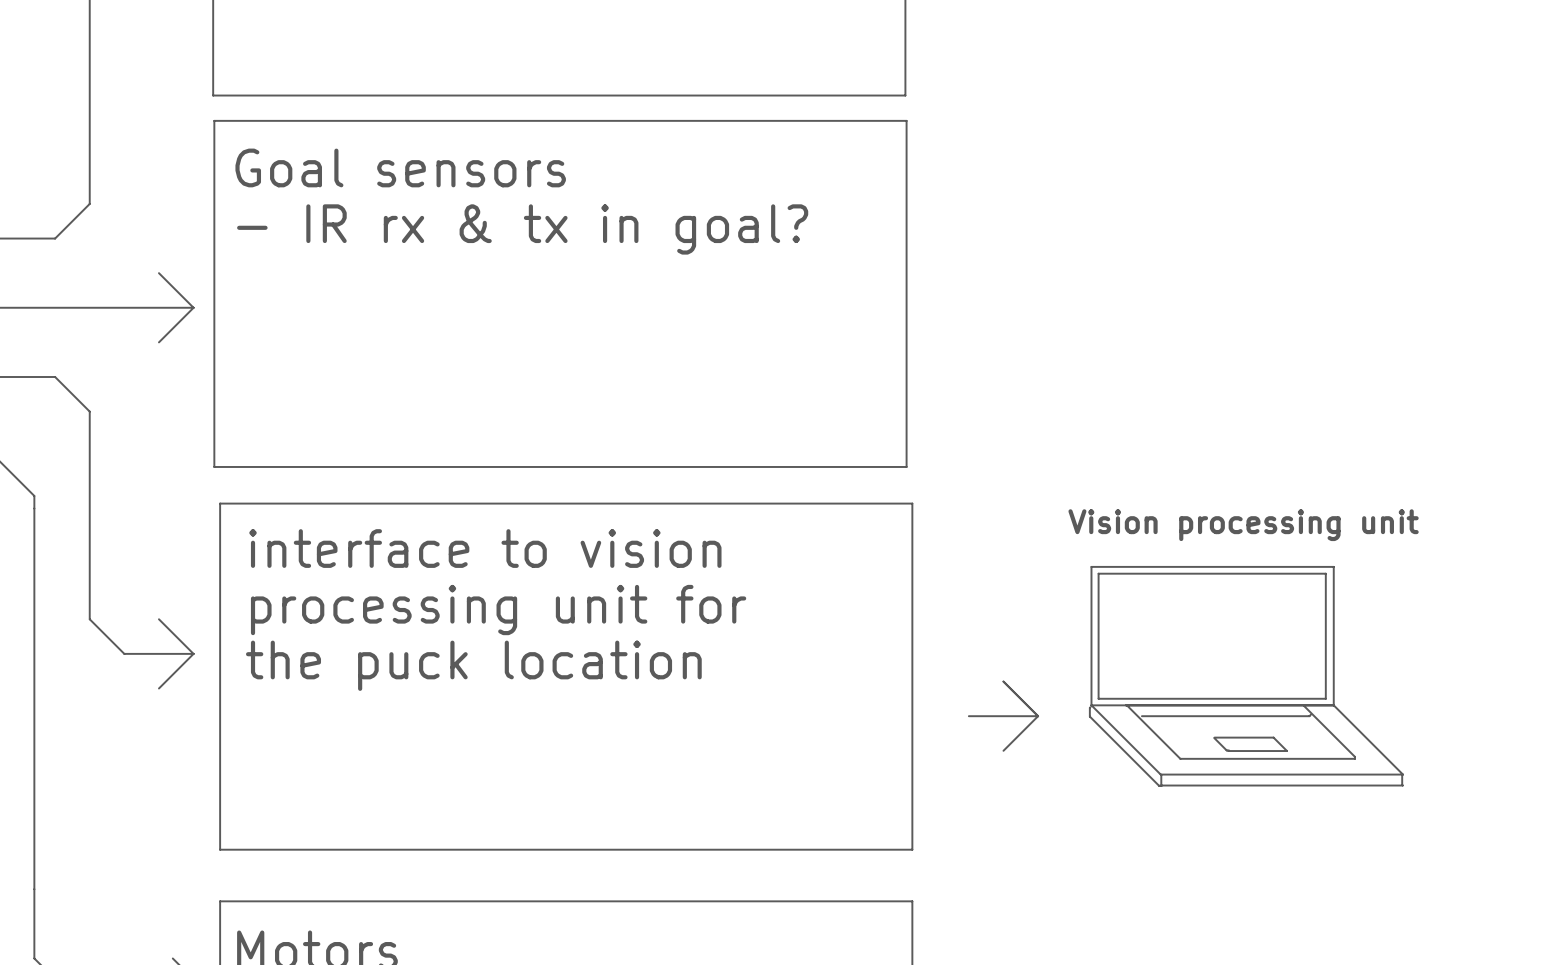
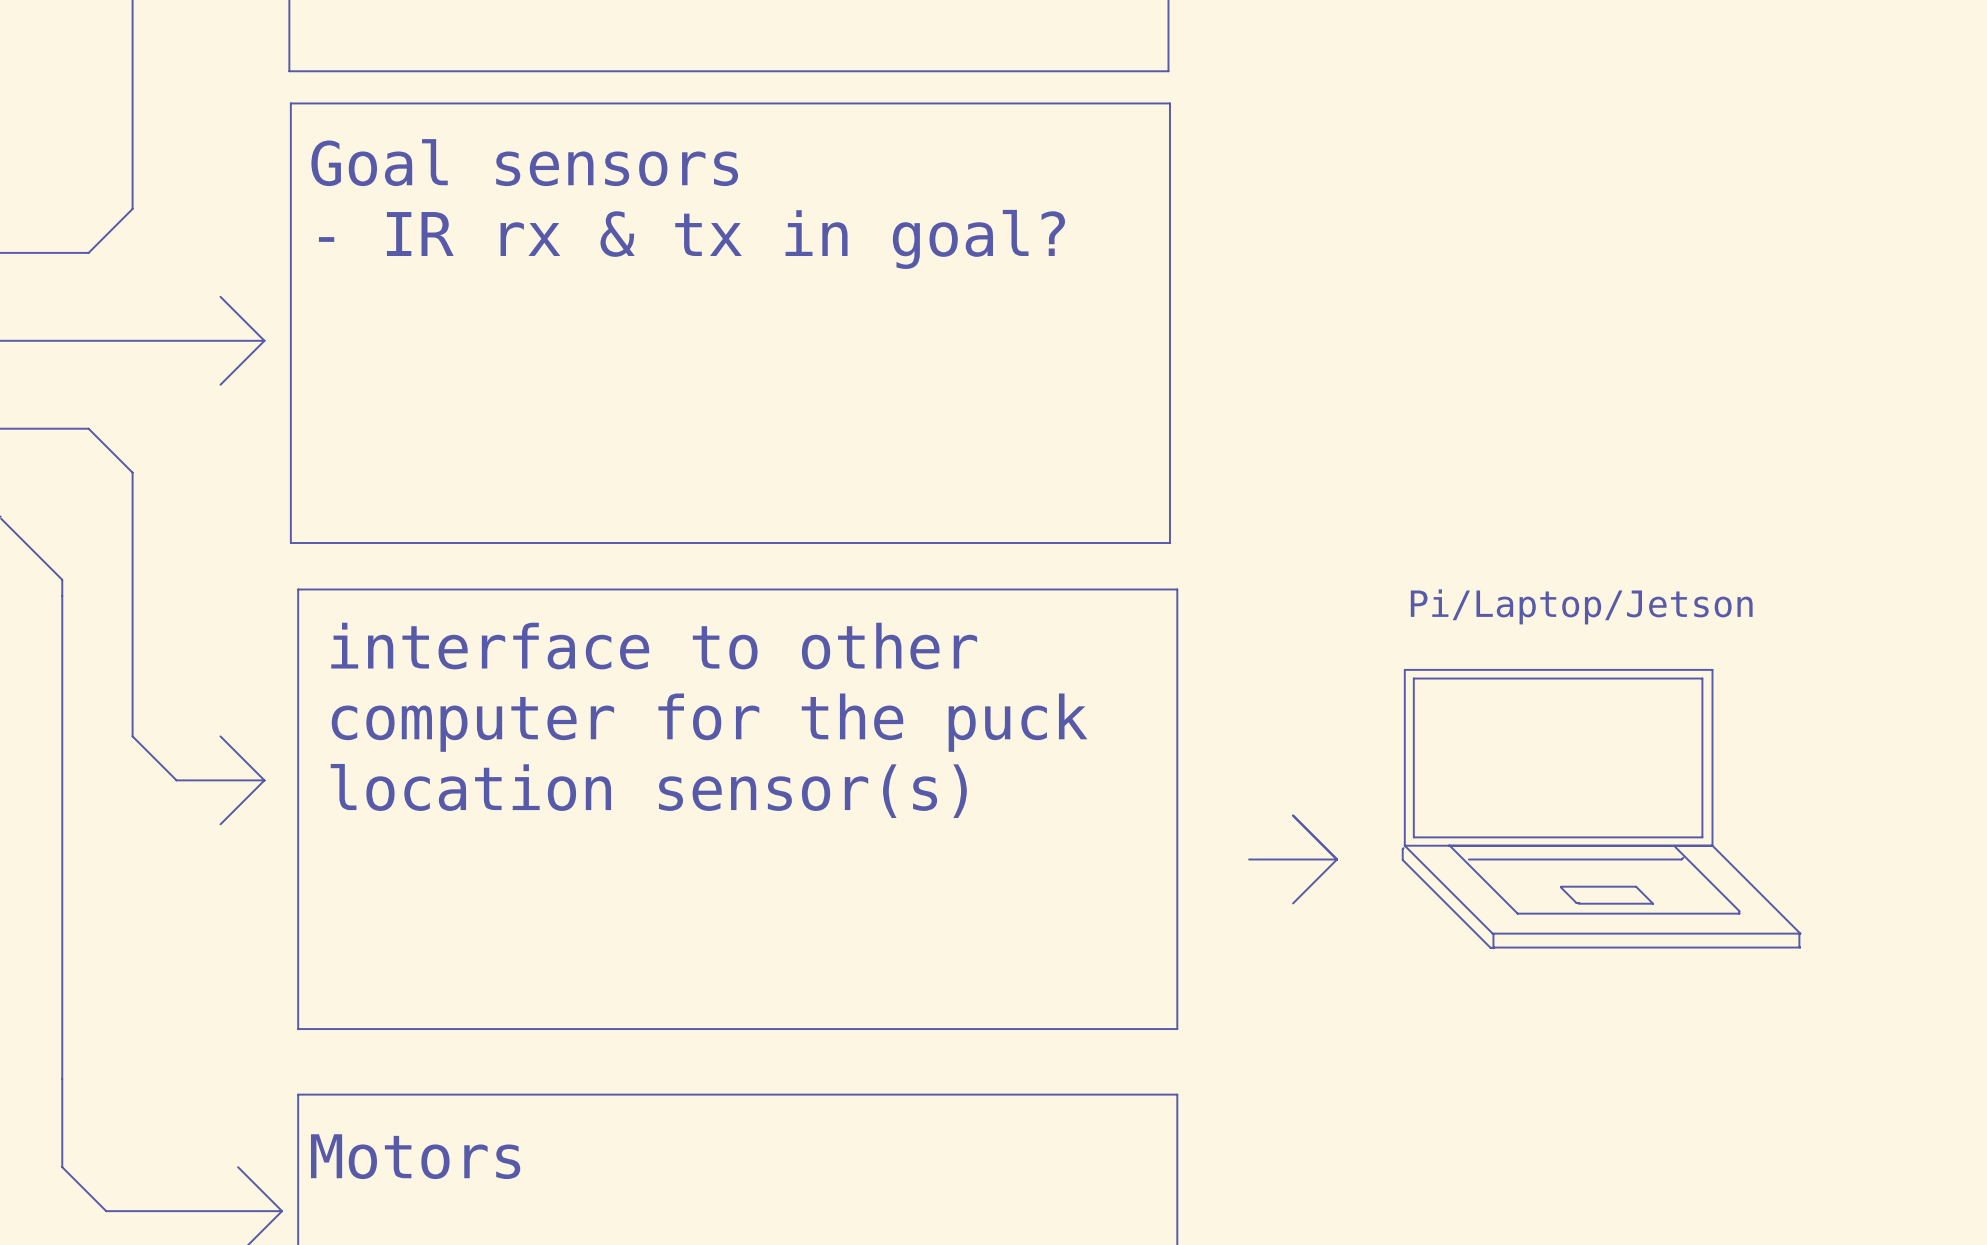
text: none -> Pi/Laptop/Jetson (1581, 606)
text: Vision processing unit (1243, 525) -> none
text: interface to vision (485, 548) -> interface to other (654, 646)
text: processing unit for (498, 610) -> computer for the puck (709, 722)
text: the puck location (473, 665) -> location sensor(s) (648, 790)

